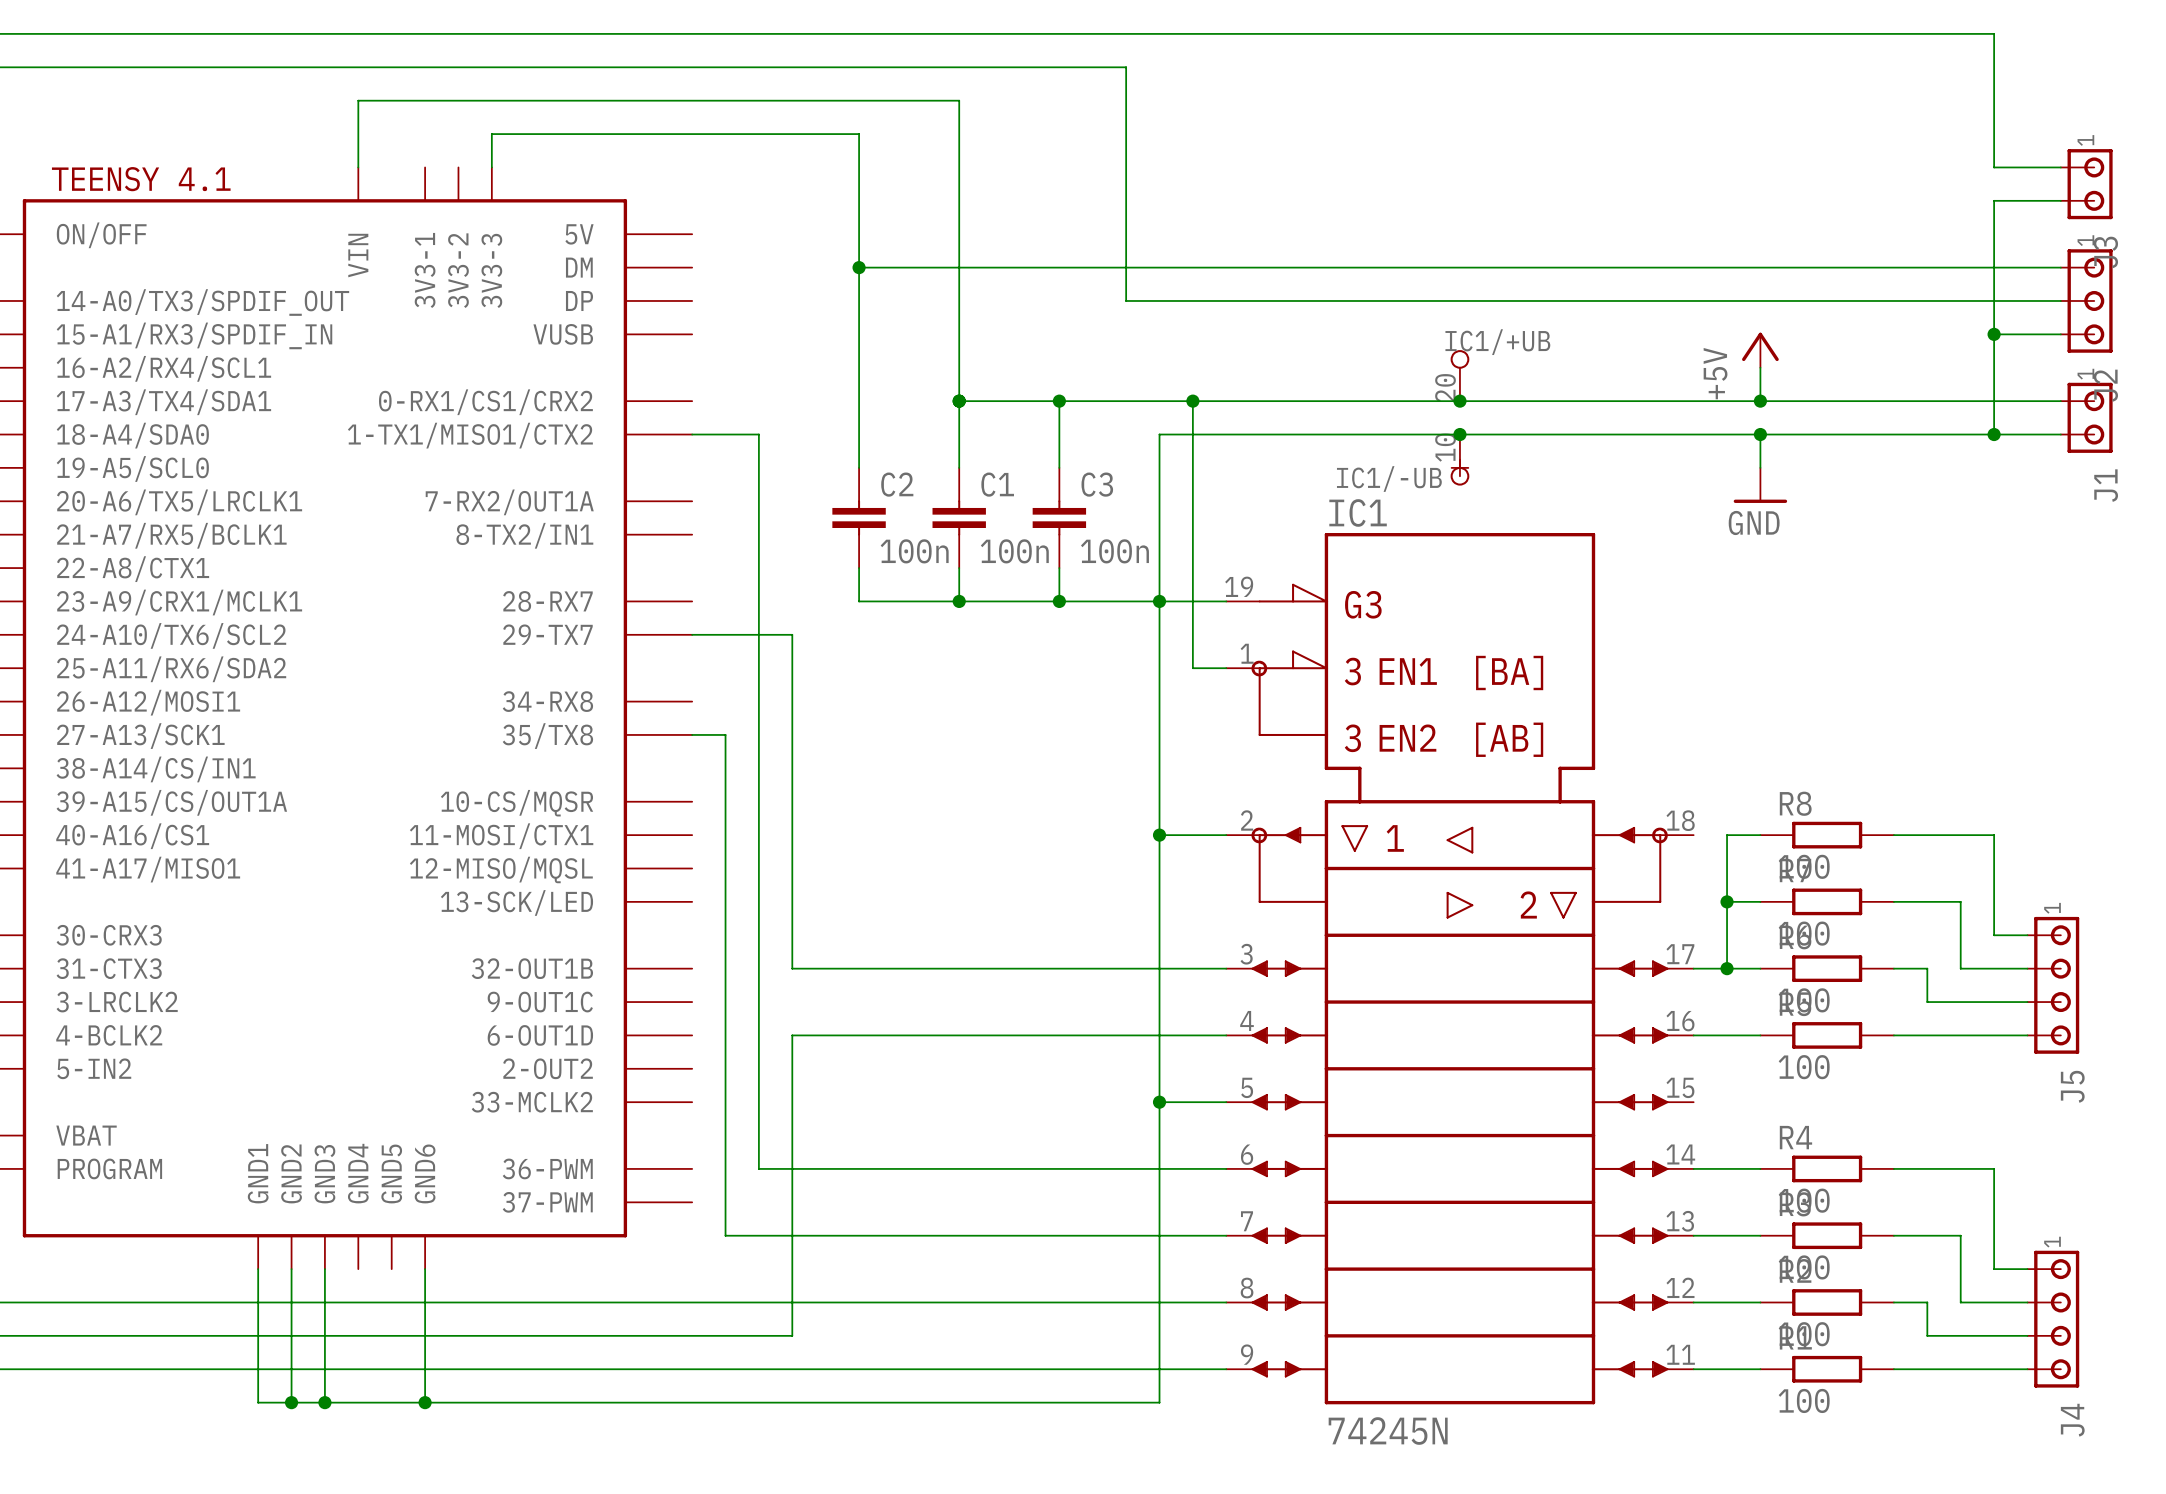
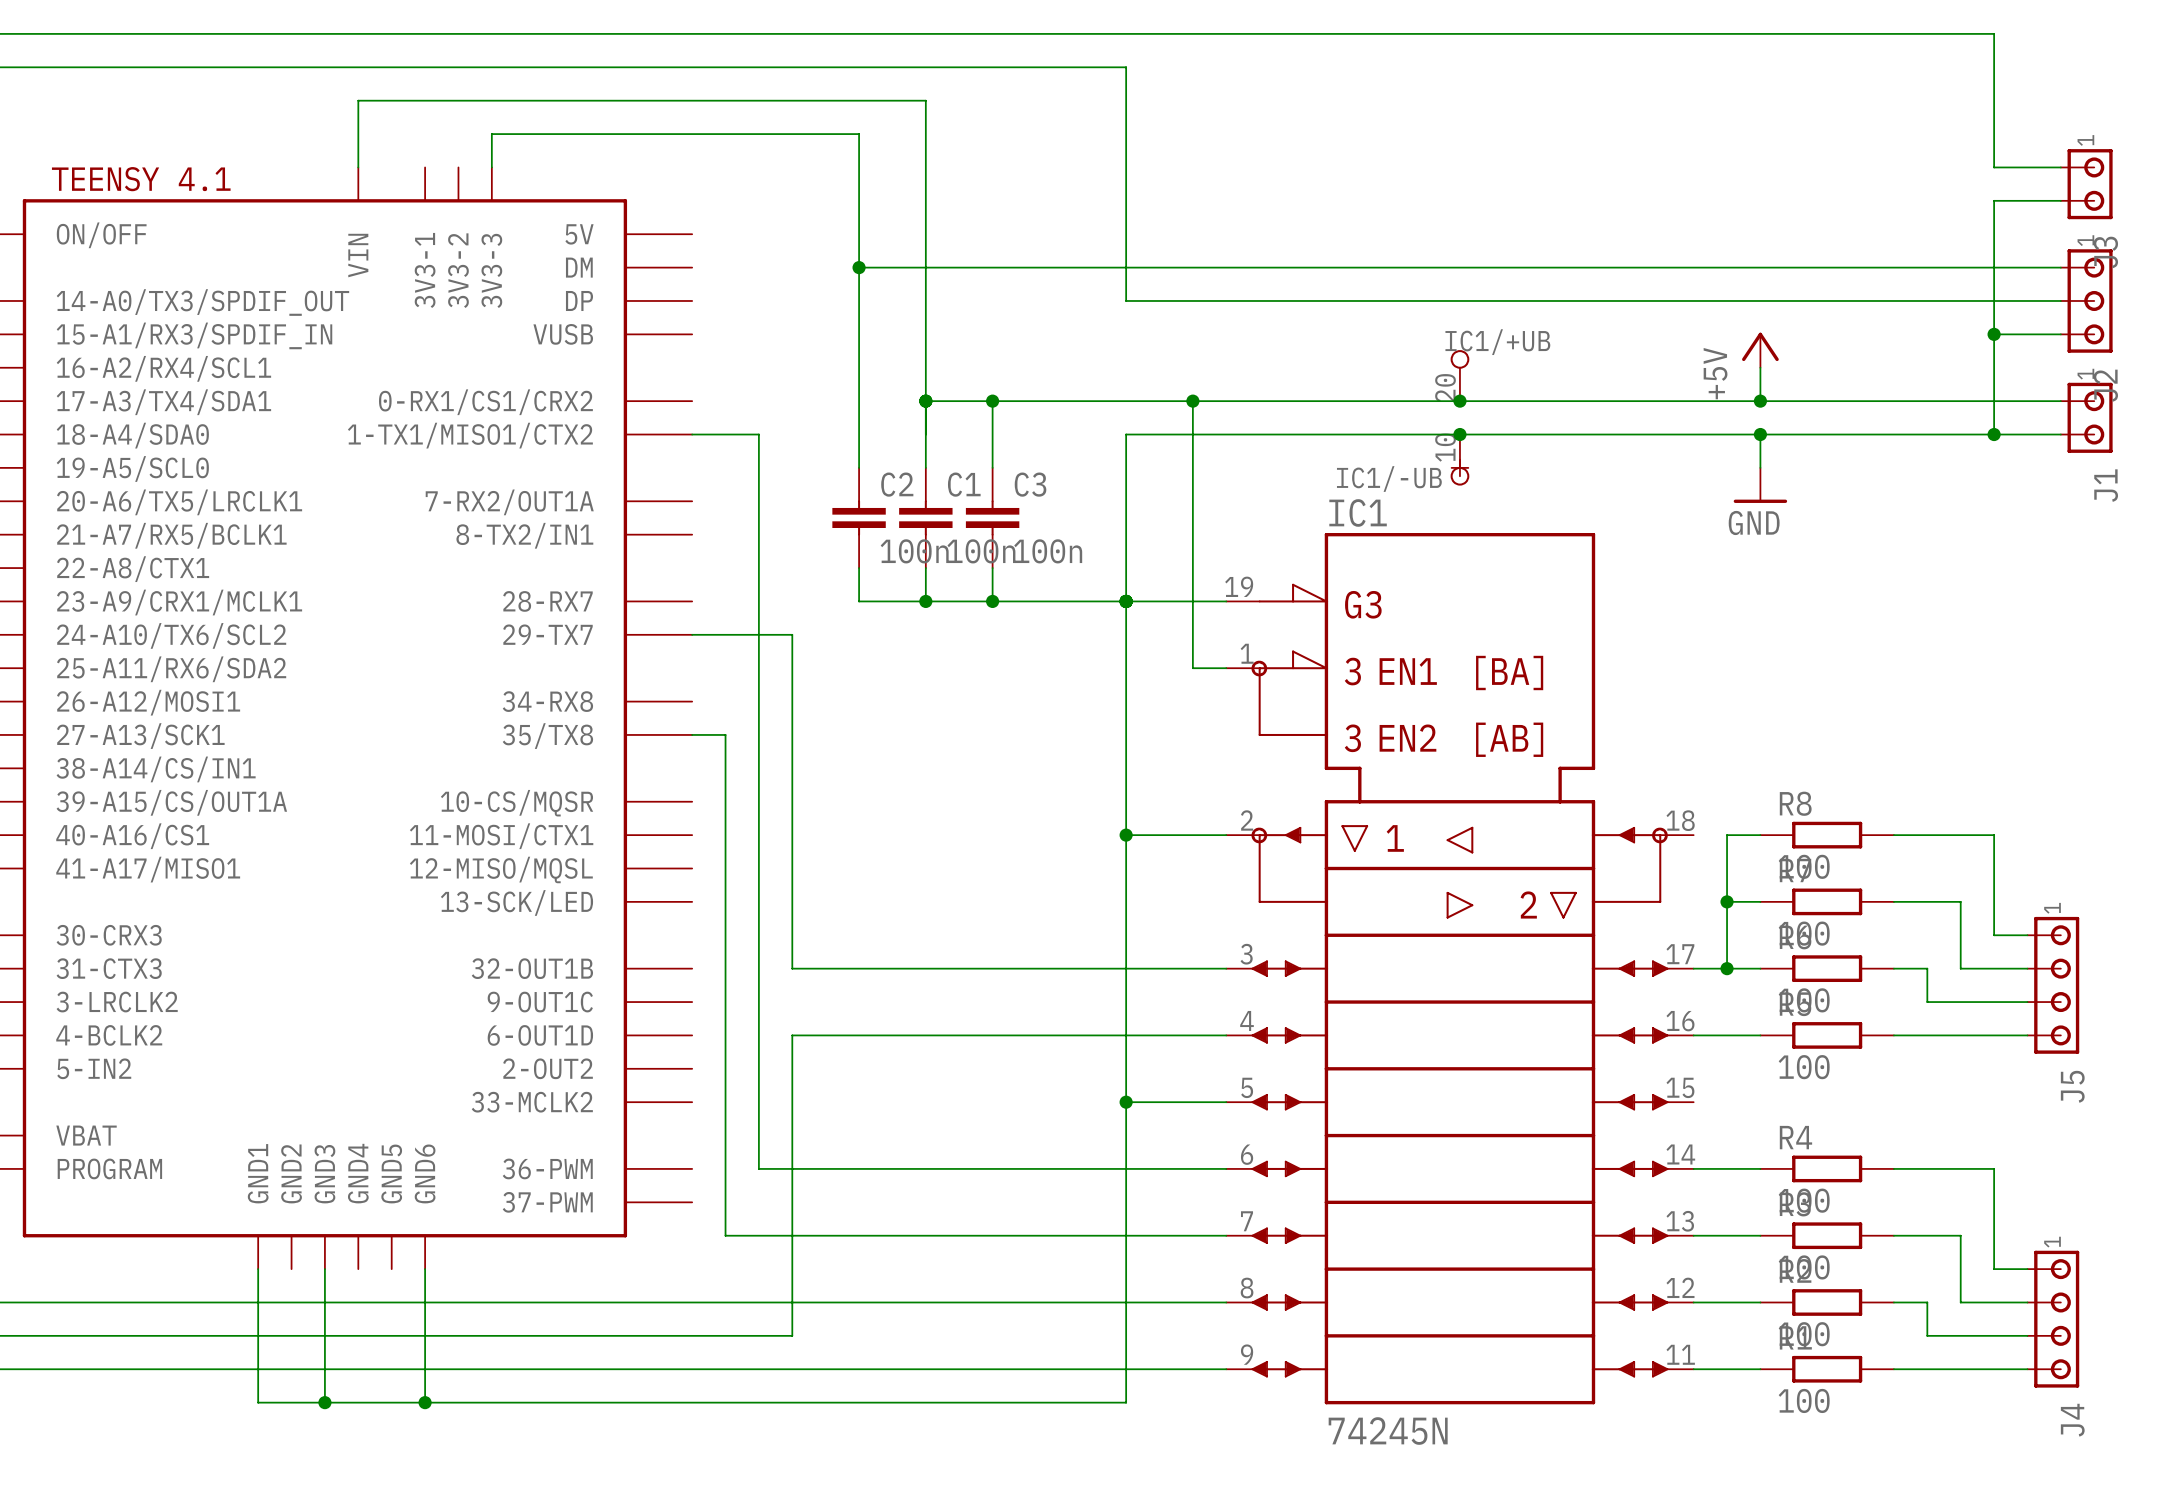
wire: (925, 100) (959, 100) (959, 467) -> (925, 100) (925, 467)
wire: none -> (925, 401) (959, 401)
junction: none -> (925, 401)
junction: (959, 401) -> none
junction: none -> (992, 401)
wire: (1059, 401) (1059, 467) -> (992, 401) (992, 467)
junction: (1059, 401) -> none
wire: (1159, 434) (1159, 1402) (1126, 1402) -> (1159, 434) (1126, 434) (1126, 1402)
C1 position: (959, 517) -> (925, 517)
C3 position: (1059, 517) -> (992, 517)
wire: (959, 568) (959, 601) -> (925, 568) (925, 601)
wire: (1059, 568) (1059, 601) -> (992, 568) (992, 601)
junction: none -> (925, 601)
junction: (959, 601) -> none
junction: none -> (992, 601)
junction: (1059, 601) -> none
junction: none -> (1126, 601)
junction: (1159, 601) -> none
wire: none -> (1126, 835) (1159, 835)
junction position: (1159, 835) -> (1126, 835)
wire: none -> (1126, 1102) (1159, 1102)
junction position: (1159, 1102) -> (1126, 1102)
wire: (291, 1269) (291, 1402) -> none
junction: (291, 1402) -> none

